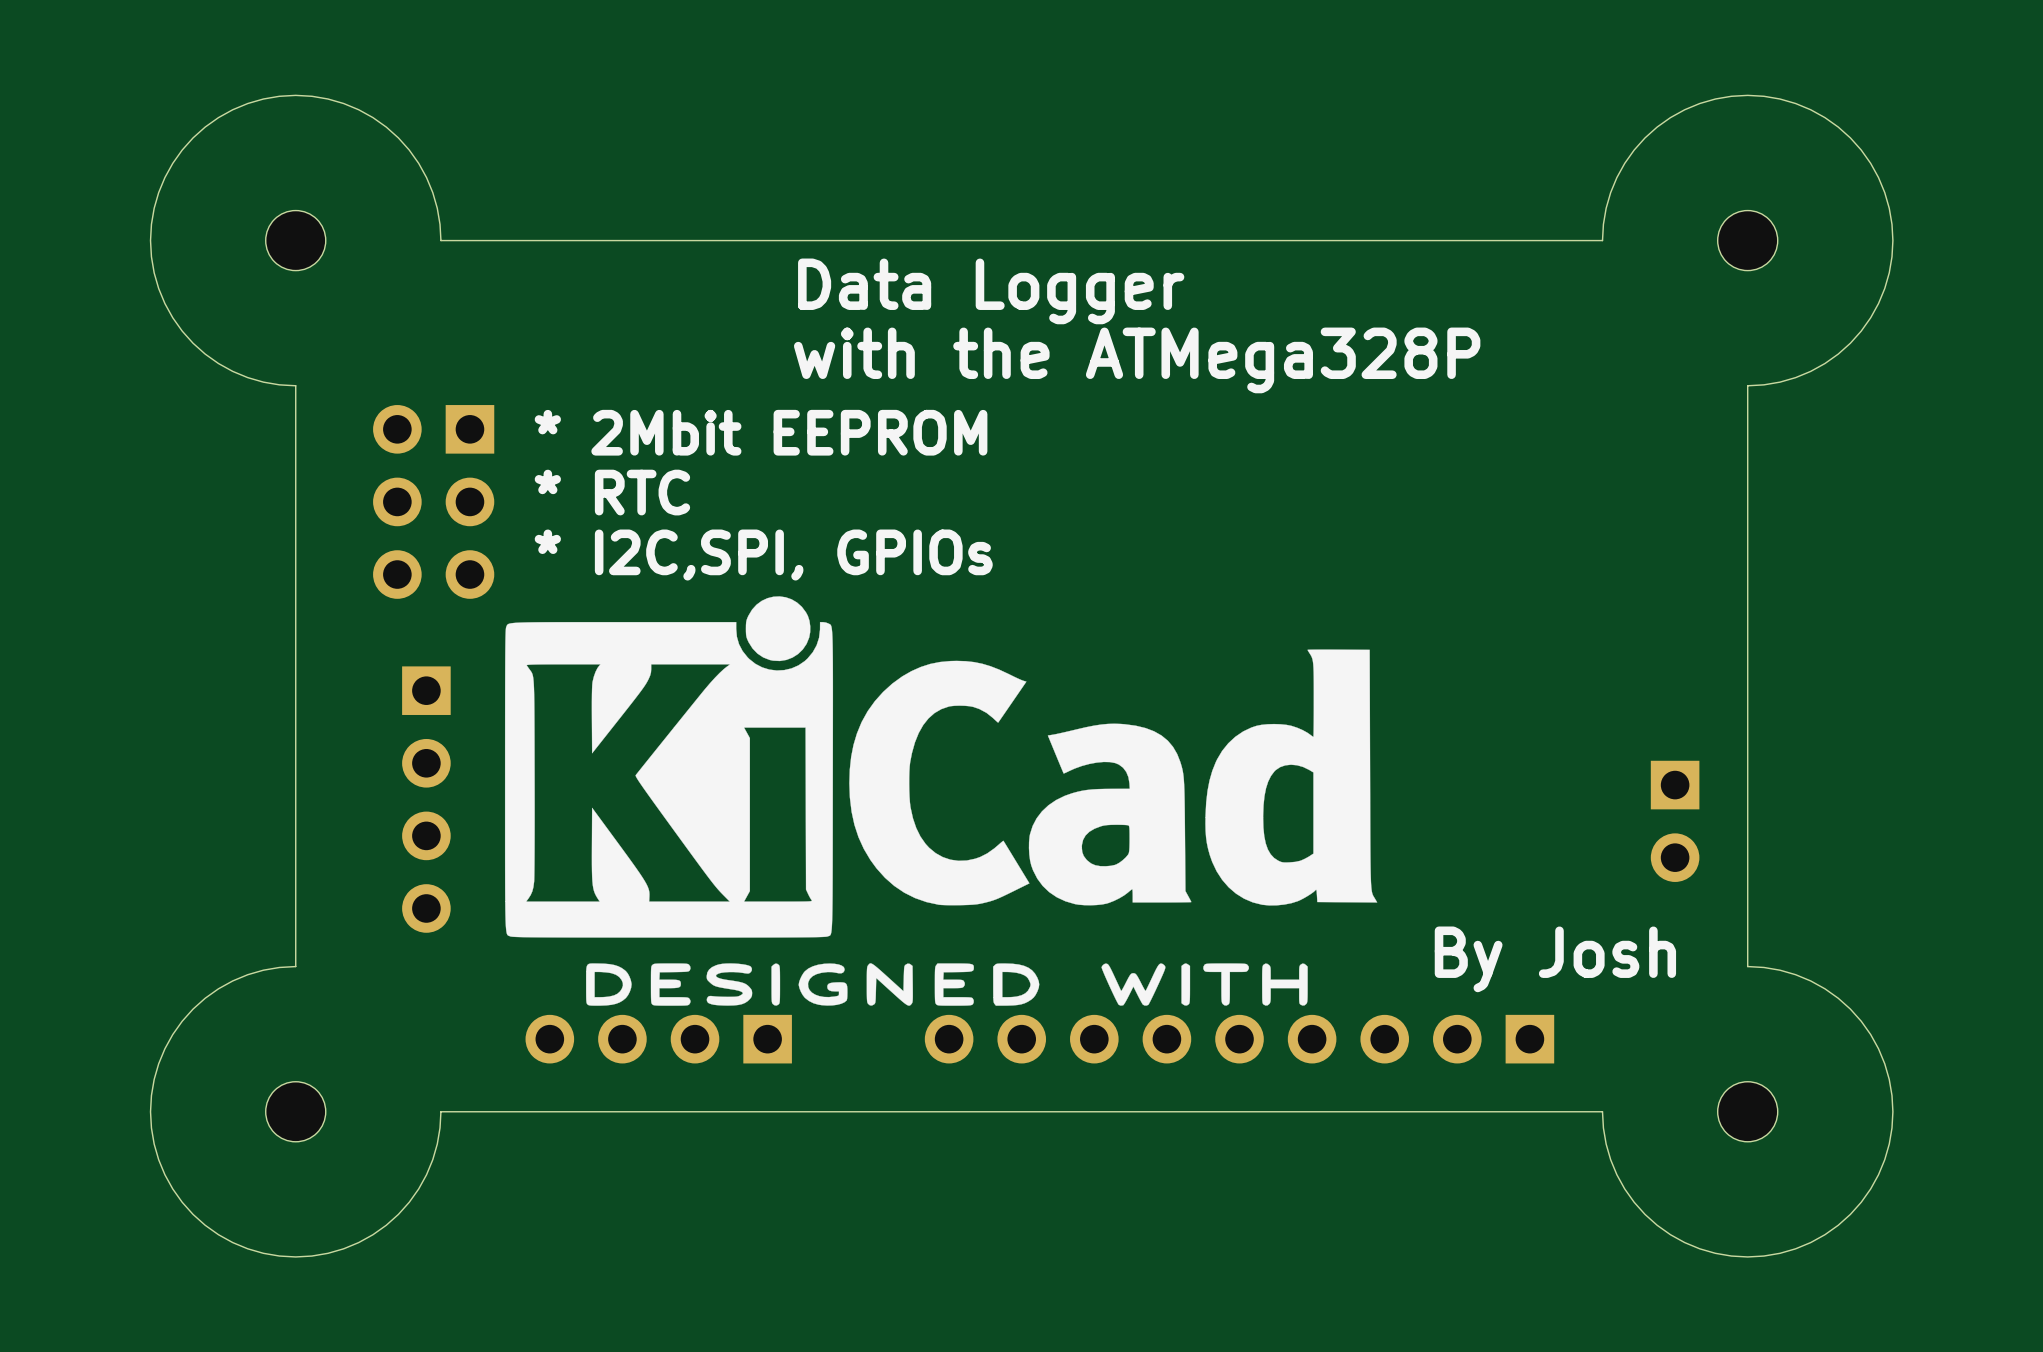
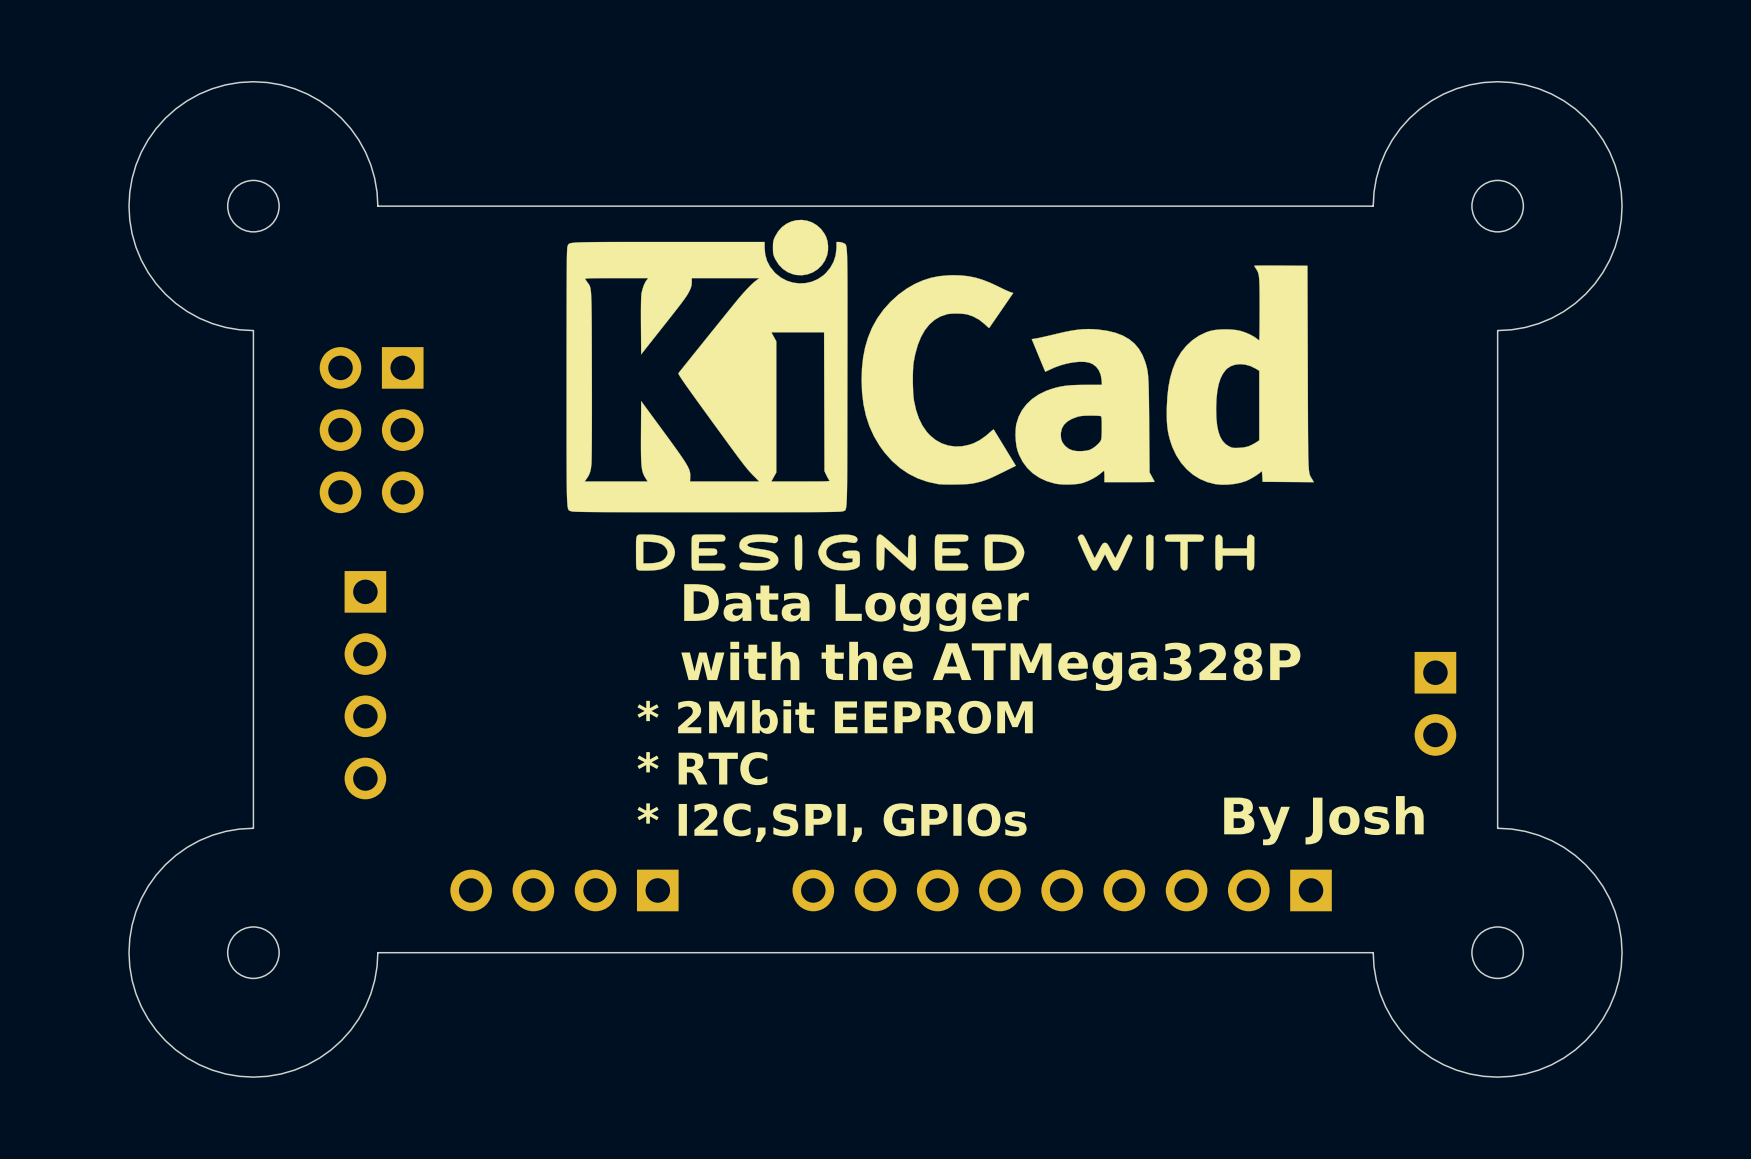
text position: Data Logger (991, 291) -> Data Logger (856, 607)
text position: with the ATMega328P (1137, 360) -> with the ATMega328P (990, 666)
text position: * 2Mbit EEPROM (761, 432) -> * 2Mbit EEPROM (835, 716)
text position: * RTC (612, 492) -> * RTC (702, 768)
text position: * I2C,SPI, GPIOs (763, 555) -> * I2C,SPI, GPIOs (832, 822)
drawing position: (941, 801) -> (940, 395)

